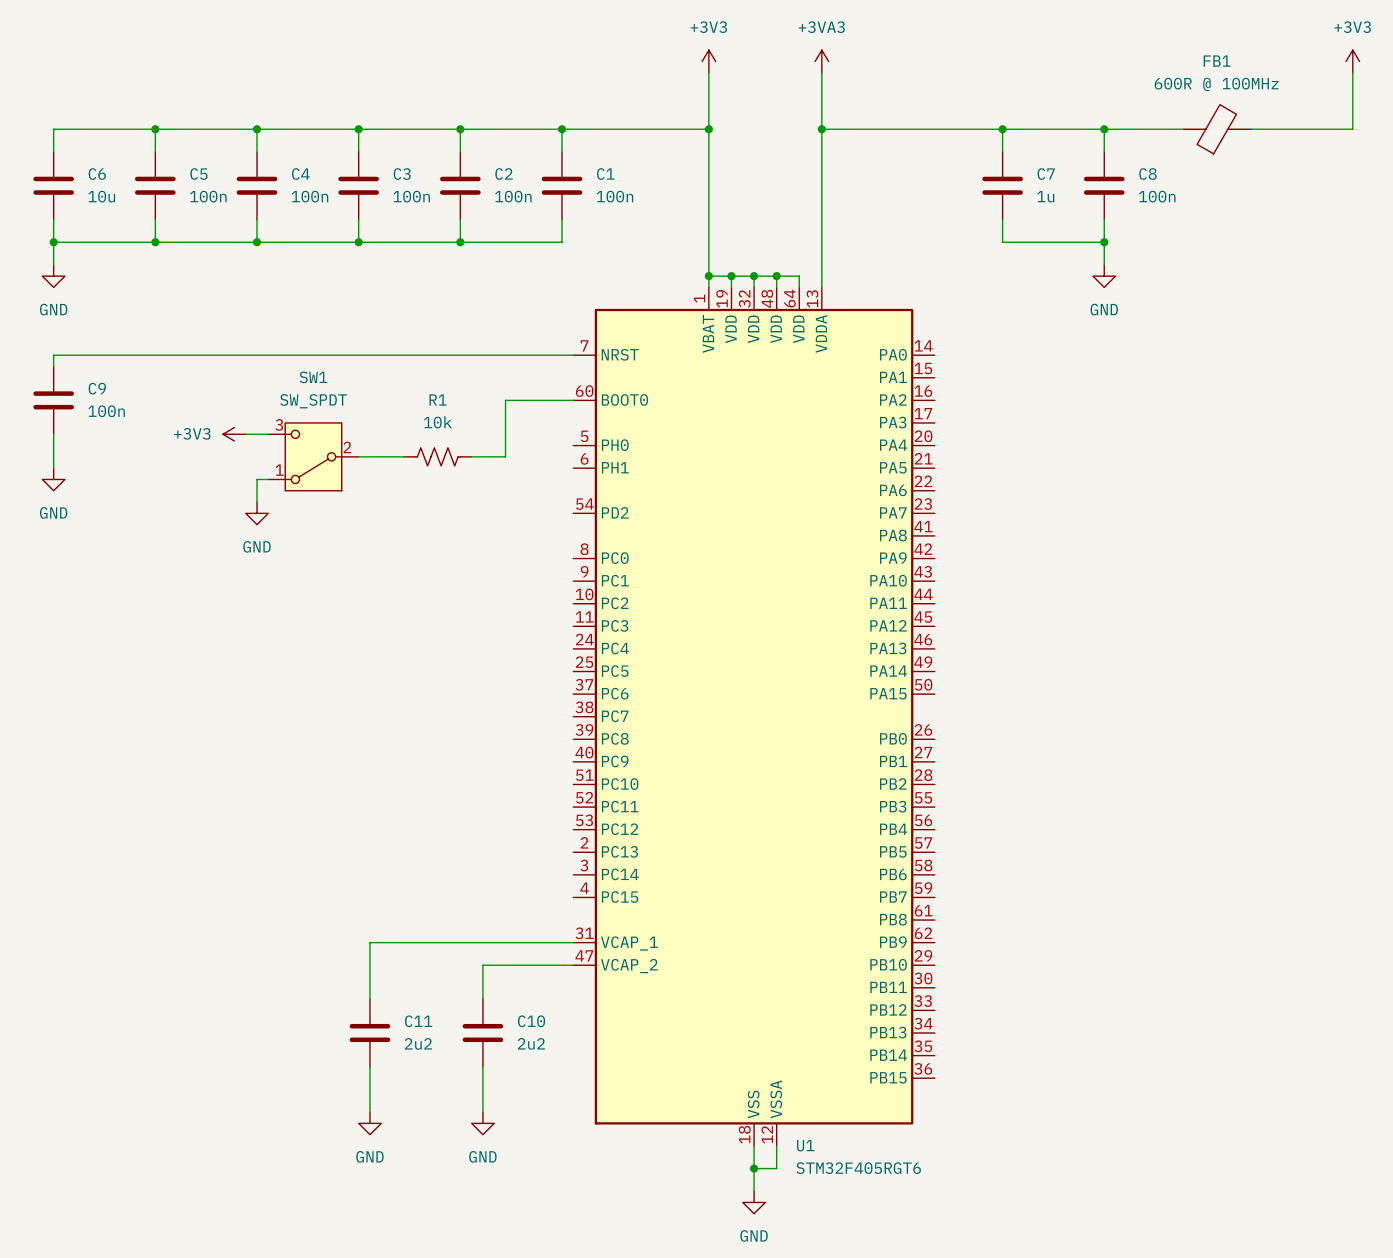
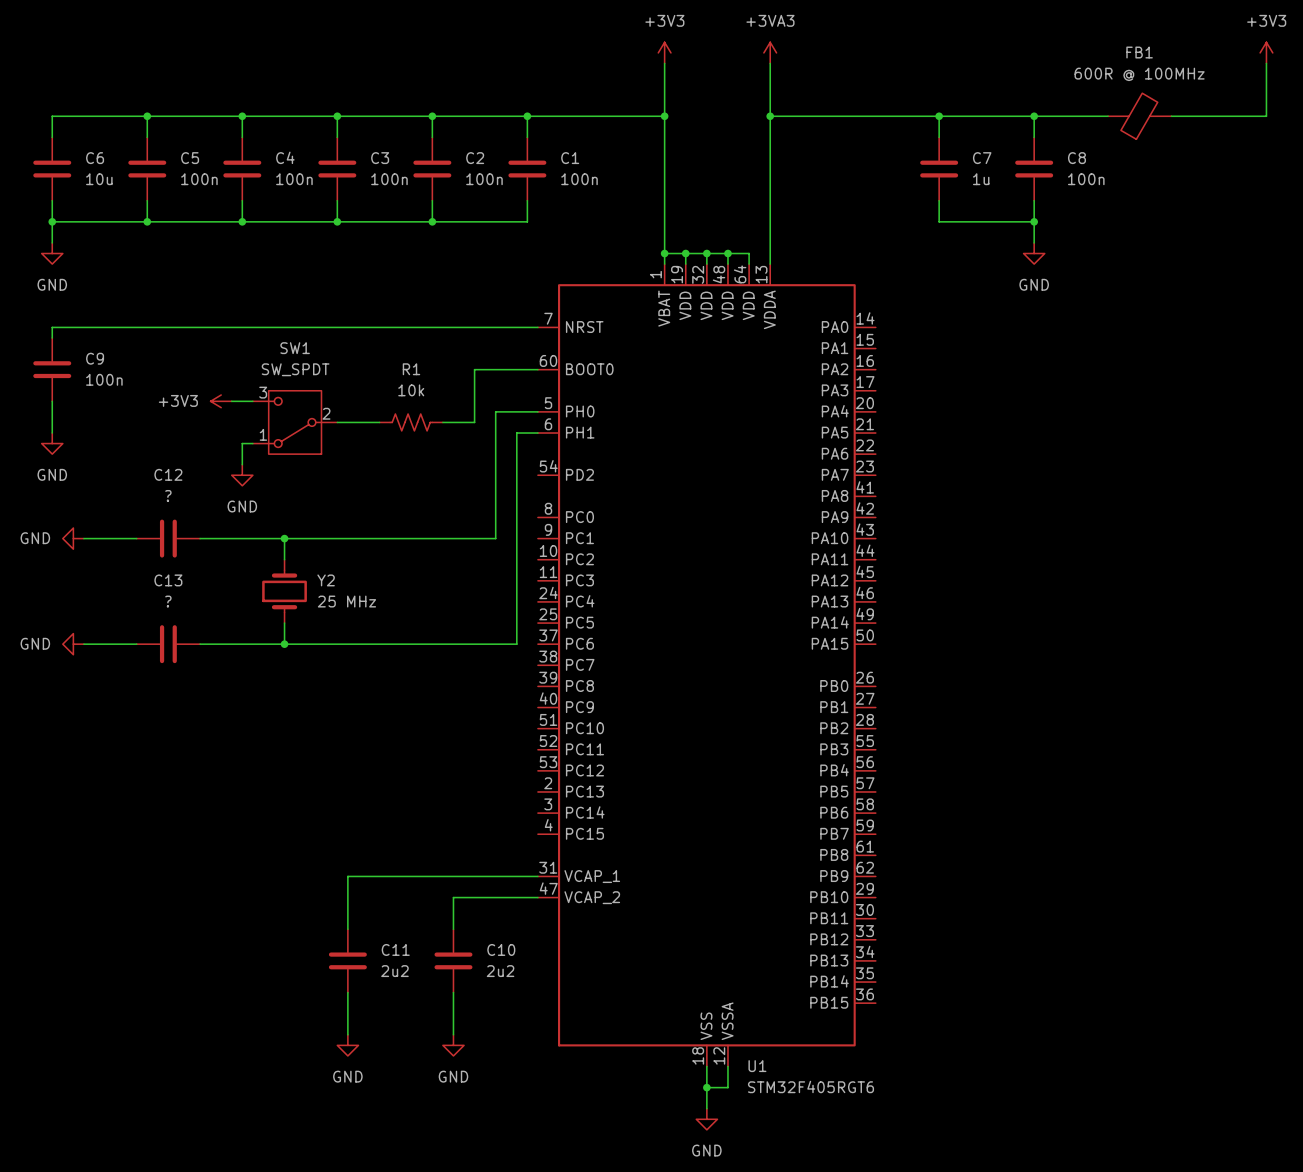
wire: none -> (537, 411) (495, 411) (495, 538) (200, 538)
wire: none -> (537, 433) (516, 433) (516, 644) (200, 644)
power symbol: none -> GND (73, 538)
wire: none -> (83, 538) (136, 538)
C12: none -> ? (168, 538)
wire: none -> (284, 538) (284, 559)
junction: none -> (284, 538)
Y2: none -> 25 MHz (284, 591)
wire: none -> (284, 623) (284, 644)
power symbol: none -> GND (73, 644)
wire: none -> (83, 644) (136, 644)
C13: none -> ? (168, 644)
junction: none -> (284, 644)

